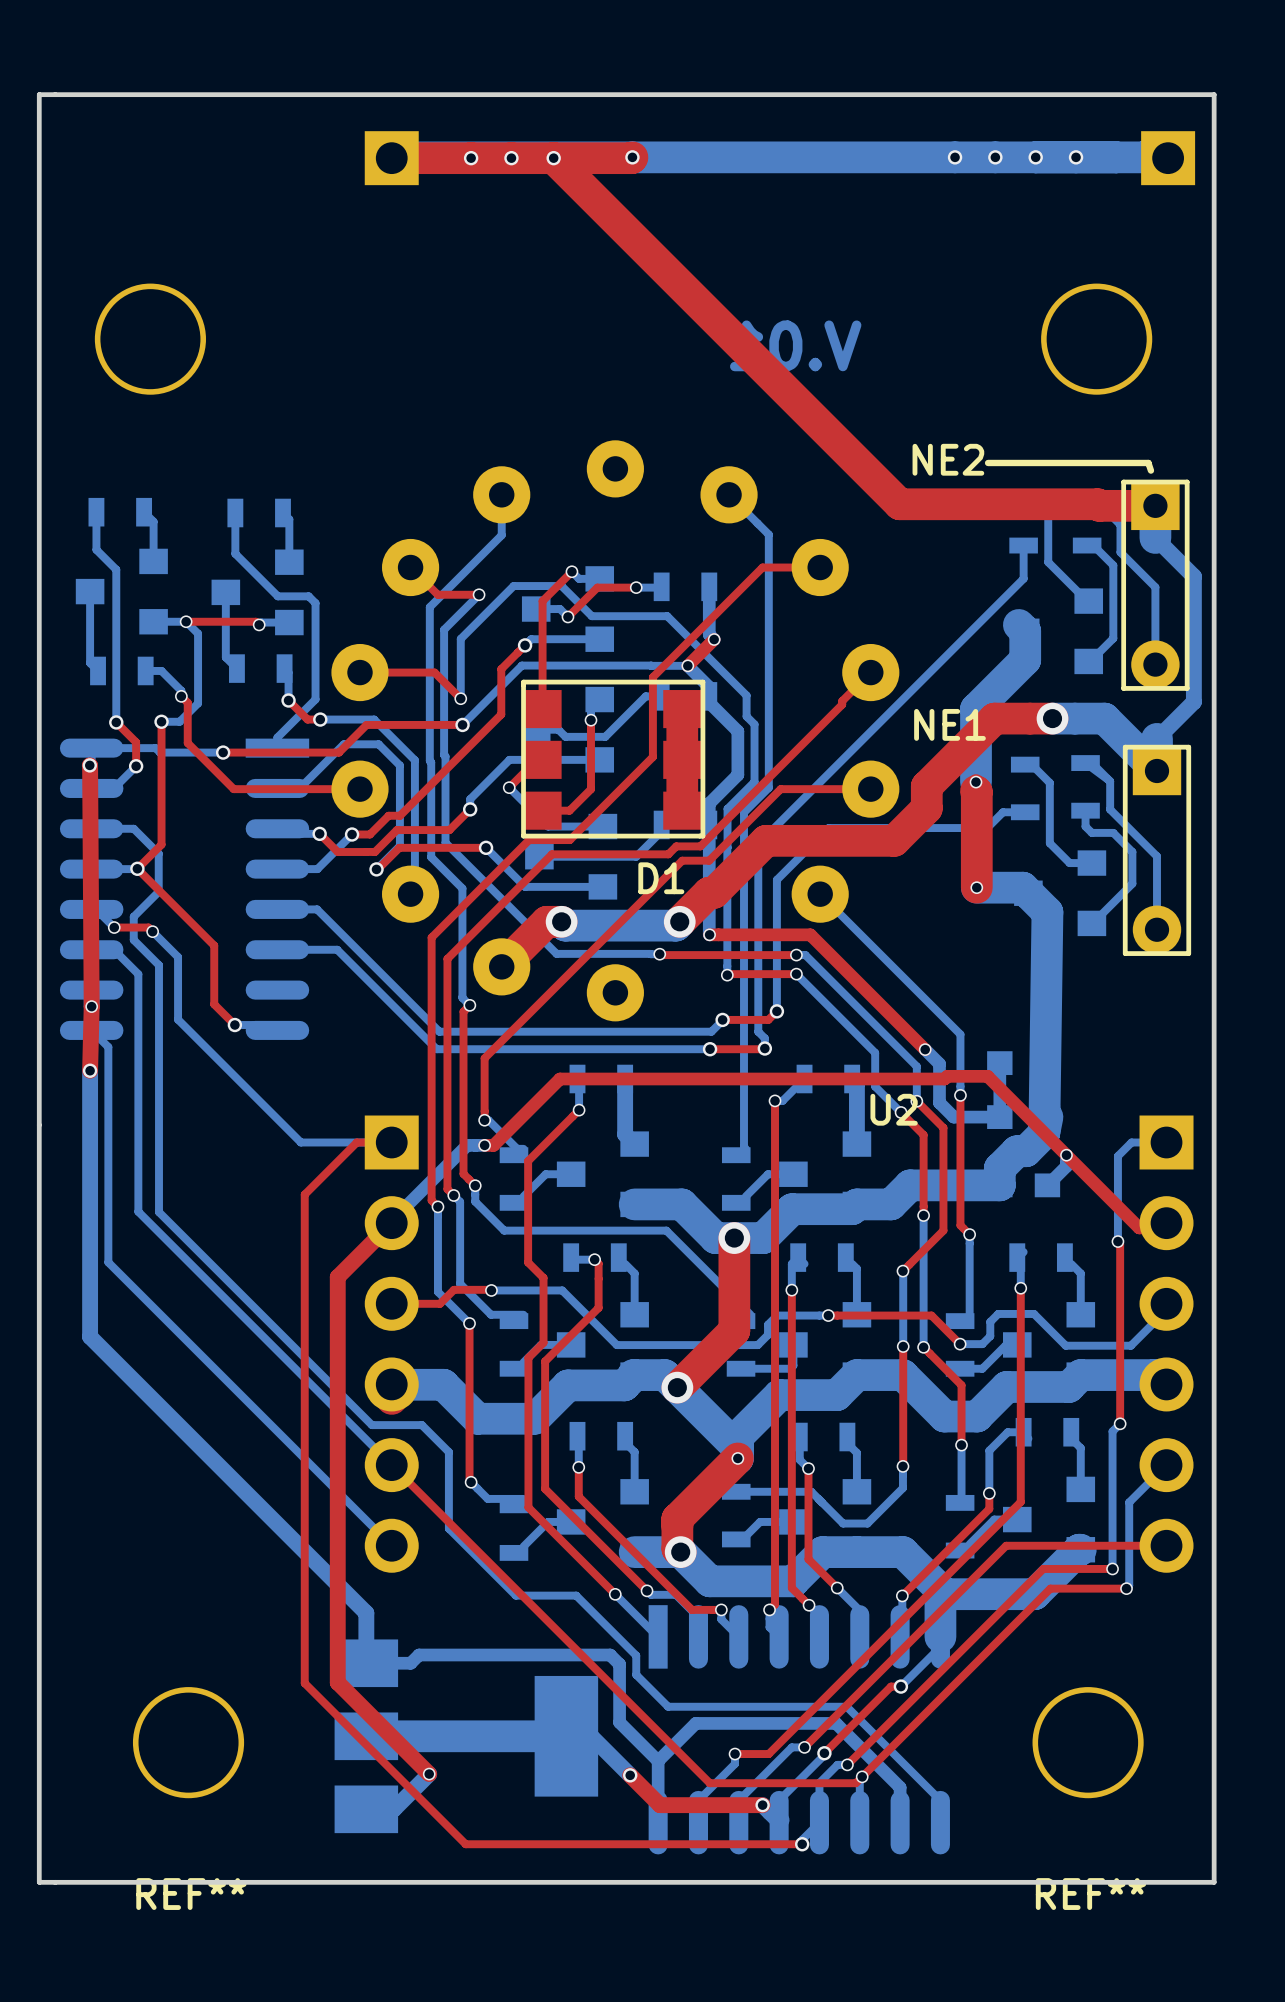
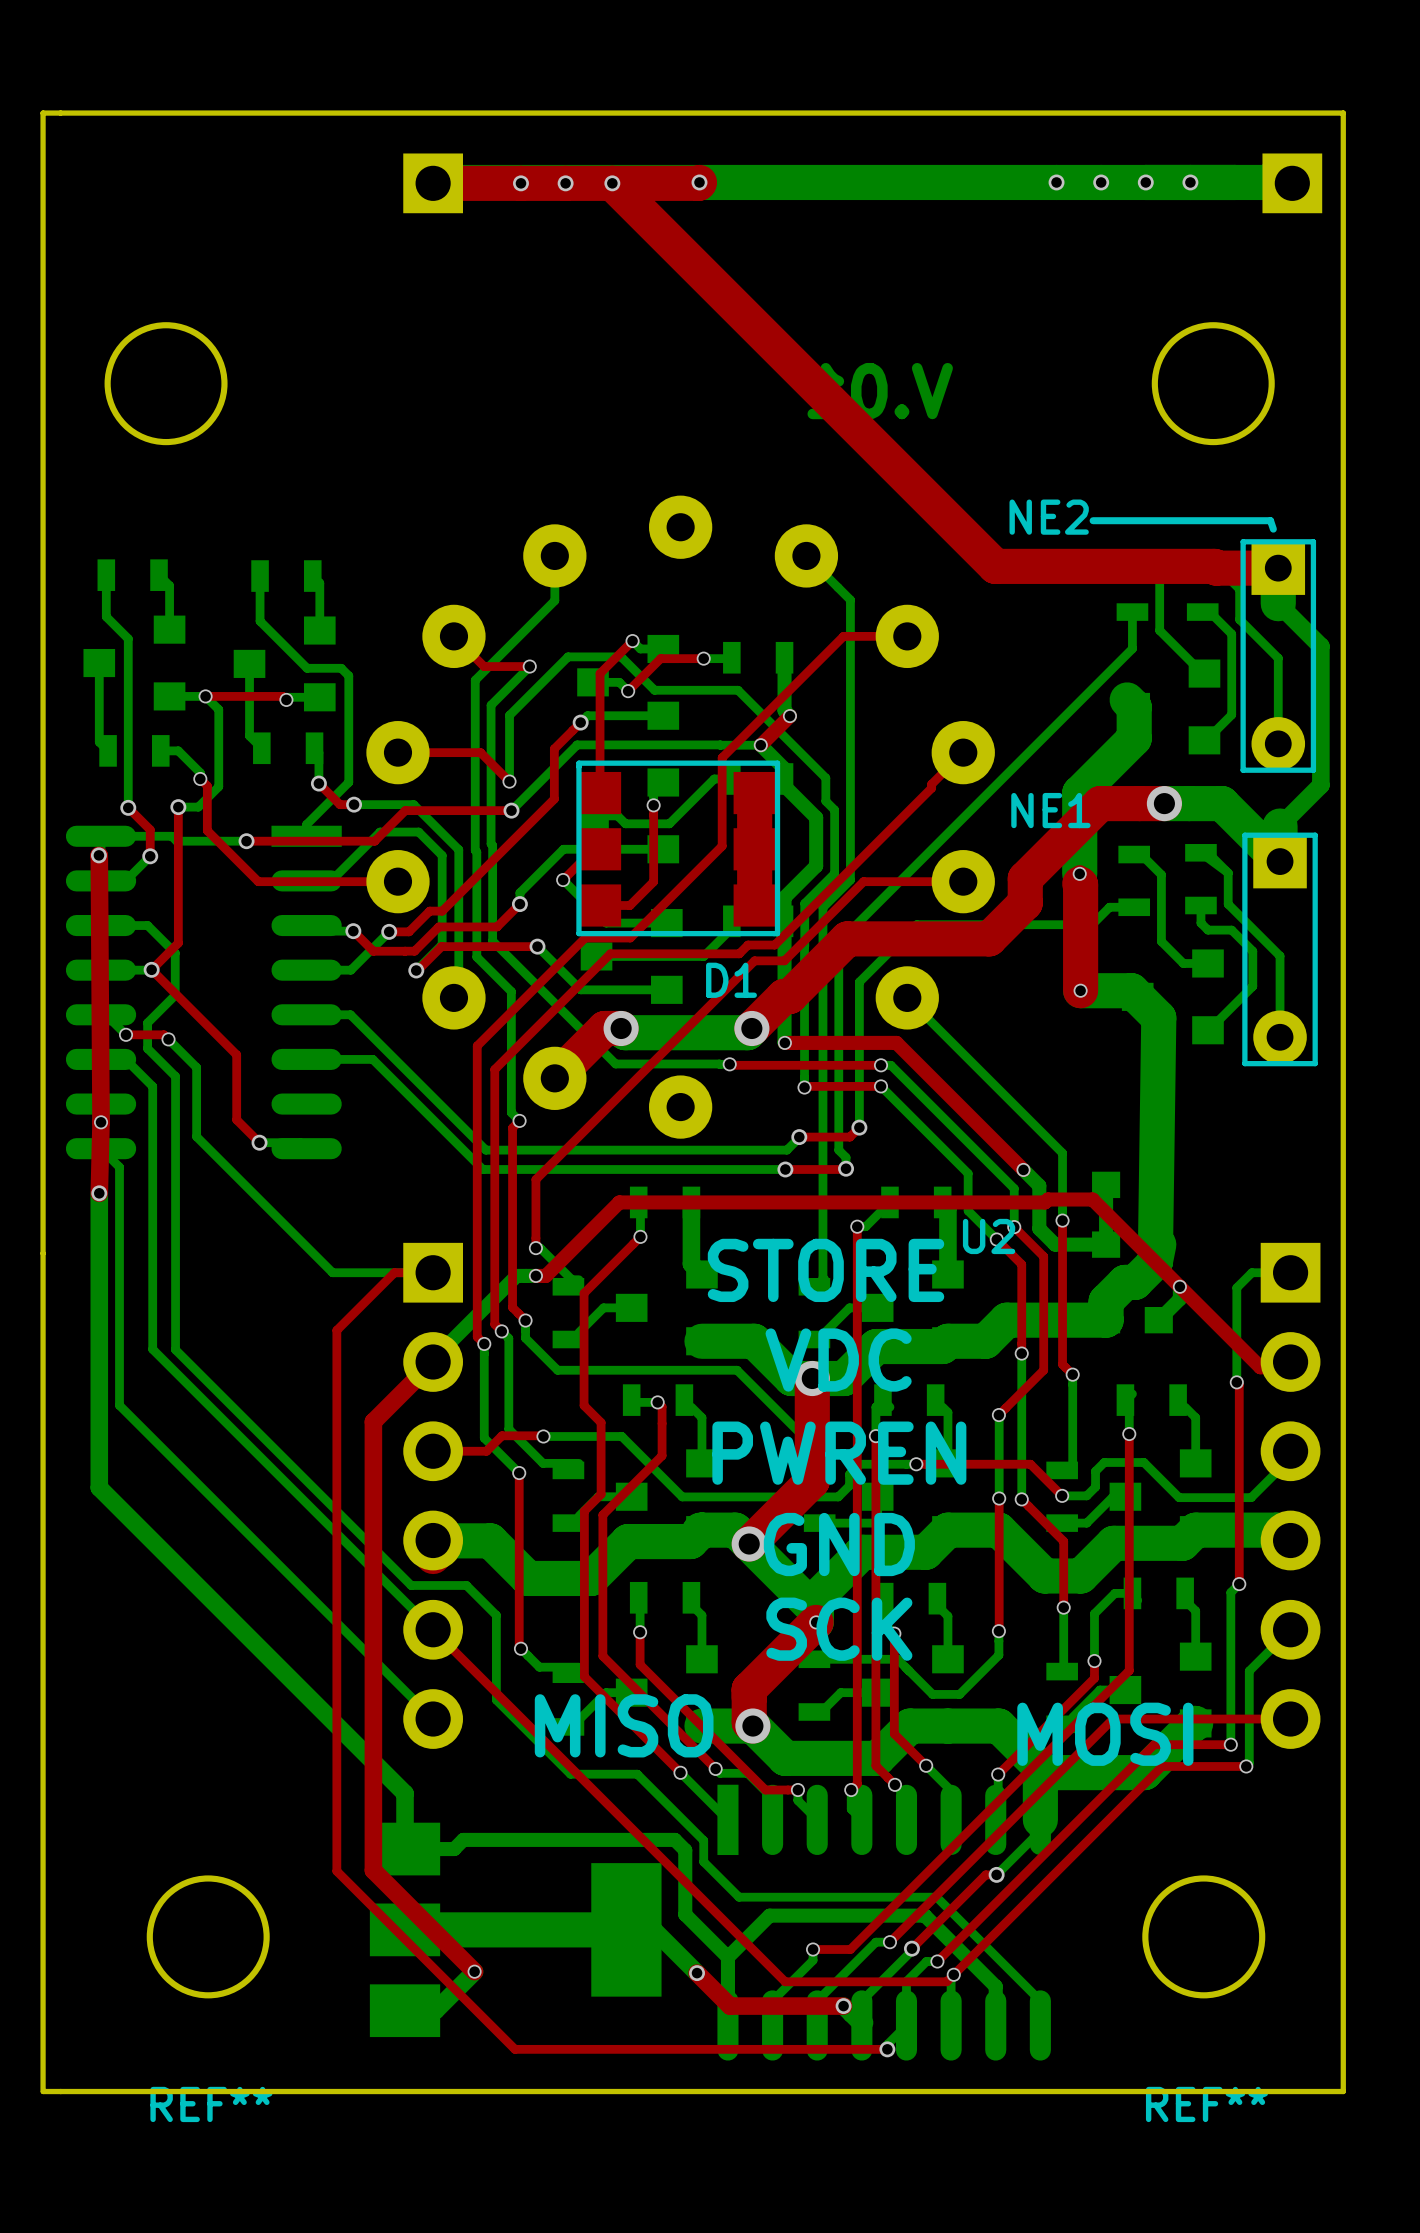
text: none -> STORE (826, 1270)
text: none -> VDC (838, 1360)
text: none -> PWREN (839, 1453)
text: none -> GND (839, 1544)
text: none -> SCK (839, 1629)
text: none -> MISO (624, 1725)
text: none -> MOSI (1105, 1734)

